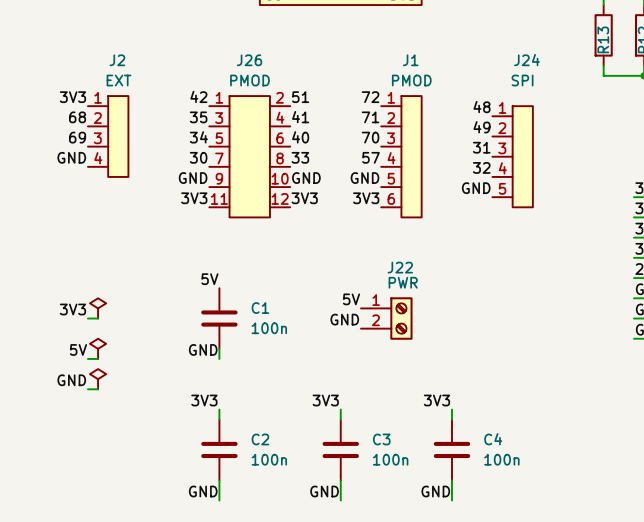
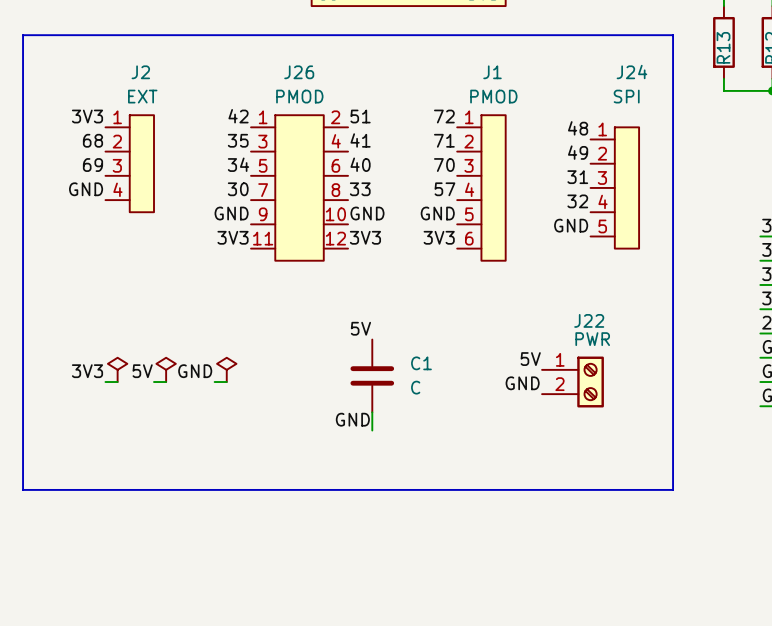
line: none -> (23, 35) (673, 35) (673, 489) (23, 489) (23, 35)
label: none -> 5V (360, 328)
label: 5V (209, 279) -> none
label: 5V (351, 299) -> none
label: none -> 5V (530, 359)
power symbol: none -> (166, 369)
power symbol: none -> (226, 369)
label: none -> 5V (142, 371)
label: none -> GND (195, 371)
C1 position: (219, 318) -> (372, 375)
J22 position: (386, 318) -> (572, 382)
label: GND (344, 319) -> none
label: none -> GND (522, 383)
C1 value: 100n (269, 328) -> C (415, 387)
wire: none -> (372, 412) (372, 430)
power symbol: (98, 348) -> none
wire: (219, 348) (219, 358) -> none
label: 5V (78, 349) -> none
label: GND (203, 349) -> none
label: none -> GND (352, 419)
wire: (87, 358) (98, 358) -> (154, 382) (166, 382)
power symbol: (98, 379) -> none
label: GND (71, 380) -> none
wire: (87, 389) (98, 389) -> (214, 382) (226, 382)
label: 3V3 (204, 400) -> none
label: 3V3 (325, 400) -> none
label: 3V3 (436, 400) -> none
wire: (219, 409) (219, 419) -> none
wire: (340, 409) (340, 419) -> none
wire: (451, 409) (451, 419) -> none
C2: 100n (219, 449) -> none
C3: 100n (340, 449) -> none
C4: 100n (451, 449) -> none
wire: (219, 480) (219, 500) -> none
wire: (340, 480) (340, 500) -> none
wire: (451, 480) (451, 500) -> none
label: GND (203, 491) -> none
label: GND (324, 491) -> none
label: GND (435, 491) -> none

